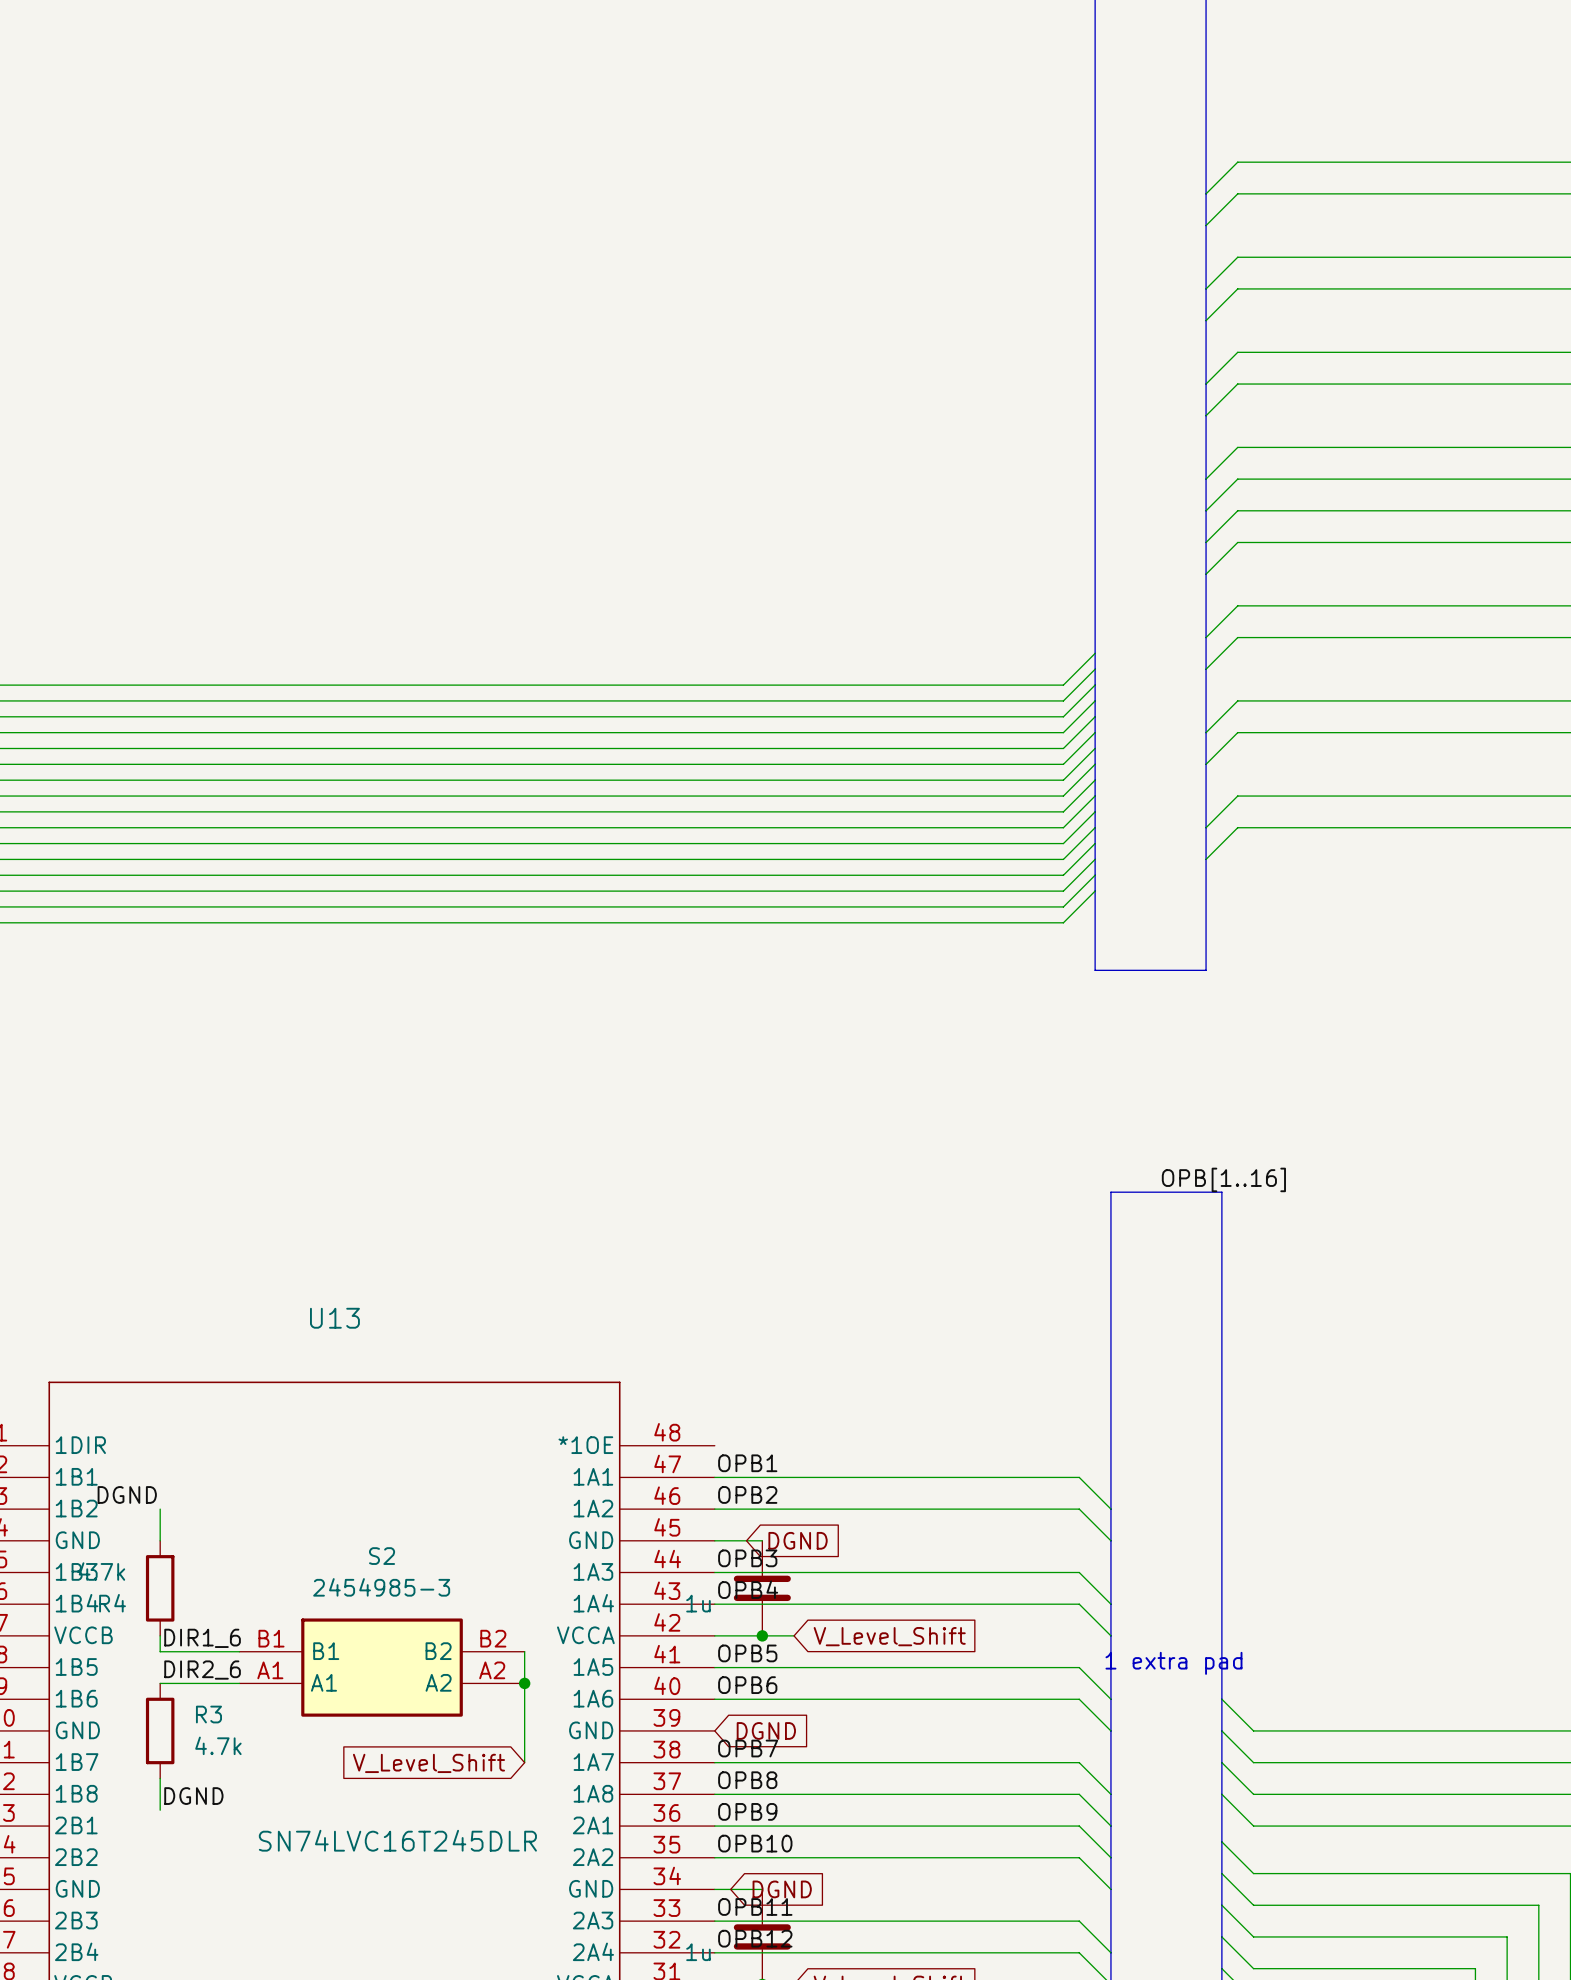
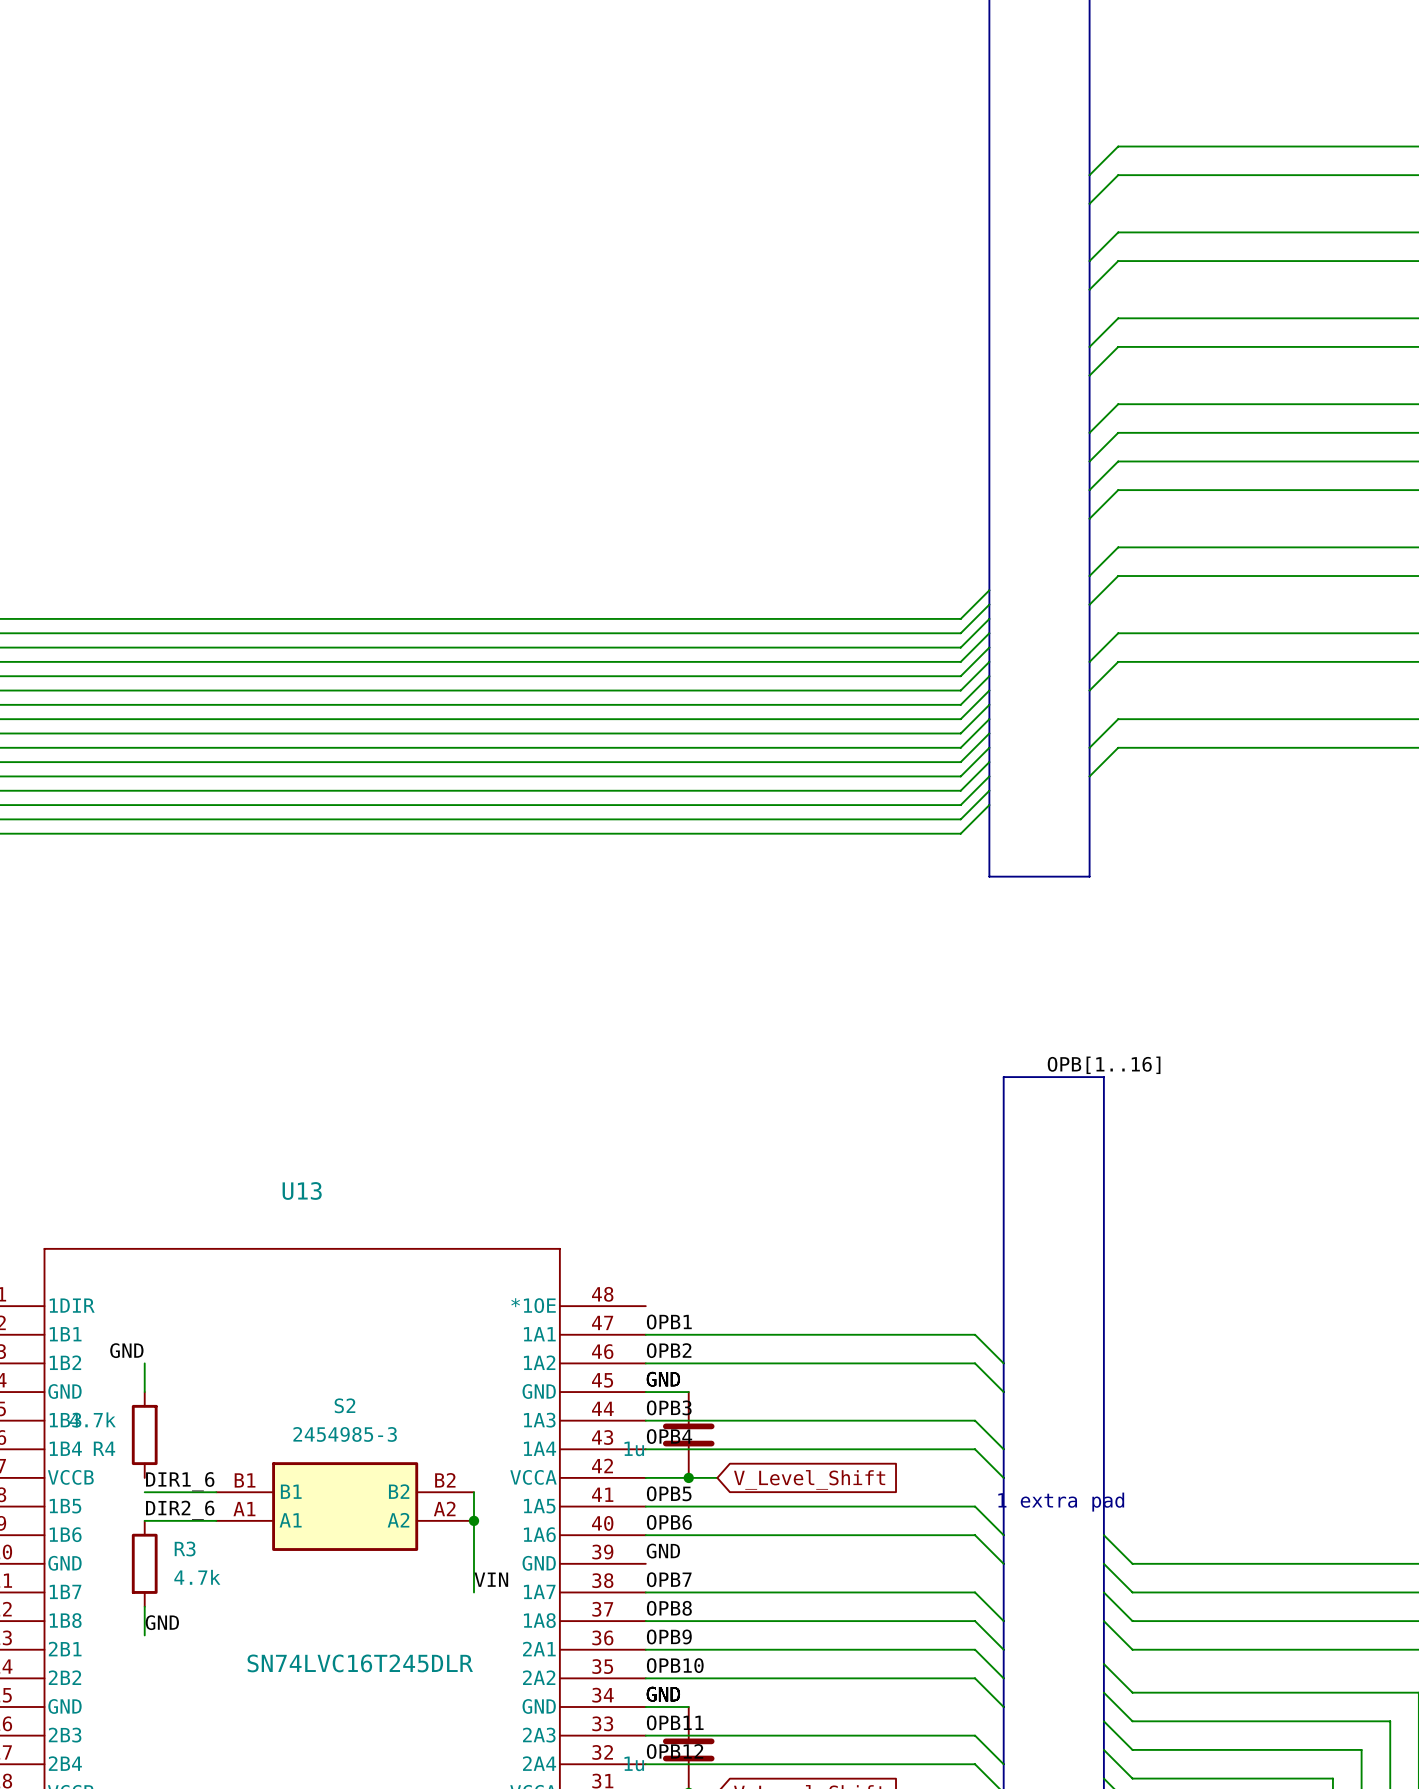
label: DGND (127, 1494) -> GND (126, 1350)
label: none -> GND (663, 1379)
global label: DGND (798, 1540) -> none
wire: (160, 1635) (160, 1651) -> none
label: none -> GND (663, 1551)
global label: DGND (766, 1730) -> none
label: none -> VIN (491, 1579)
global label: V_Level_Shift (428, 1763) -> none
label: DGND (193, 1796) -> GND (162, 1622)
label: none -> GND (663, 1694)
global label: DGND (782, 1889) -> none

